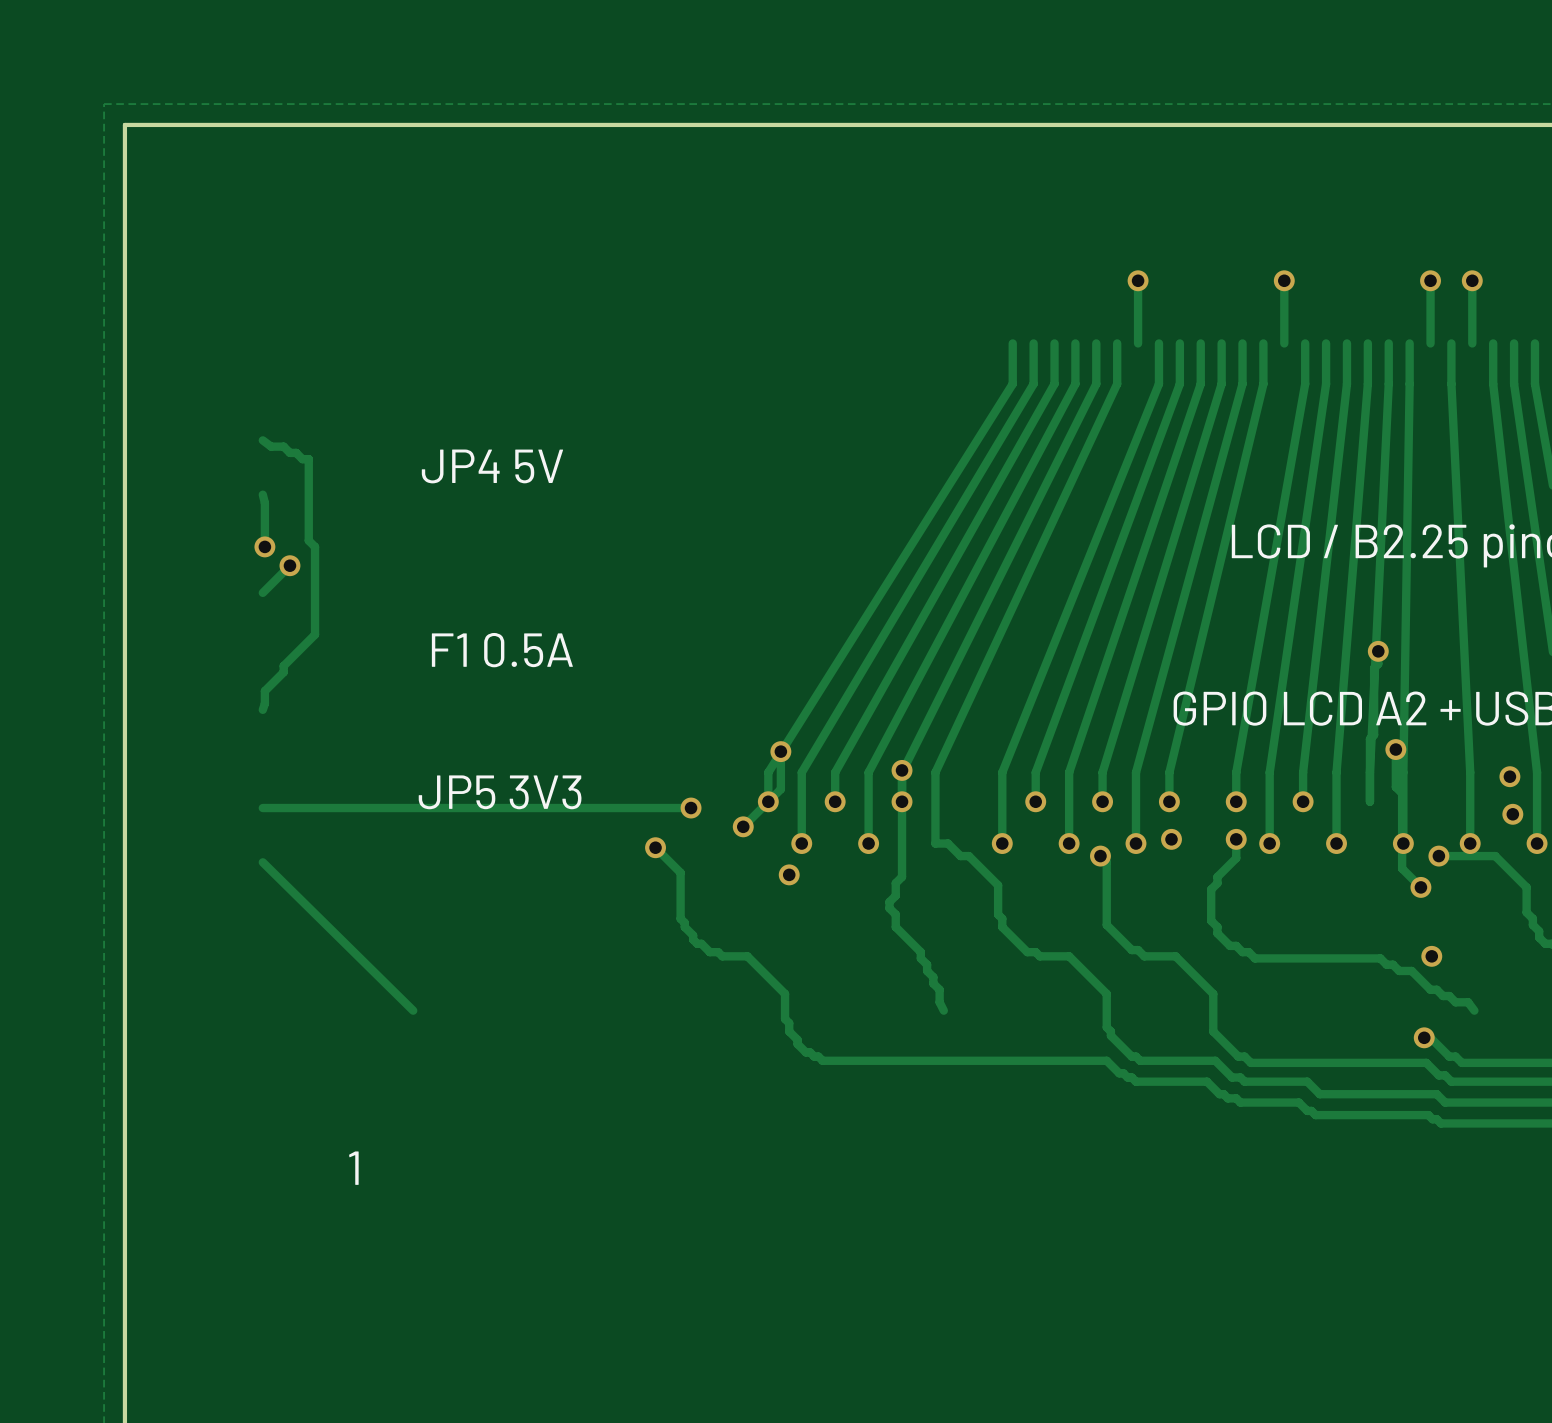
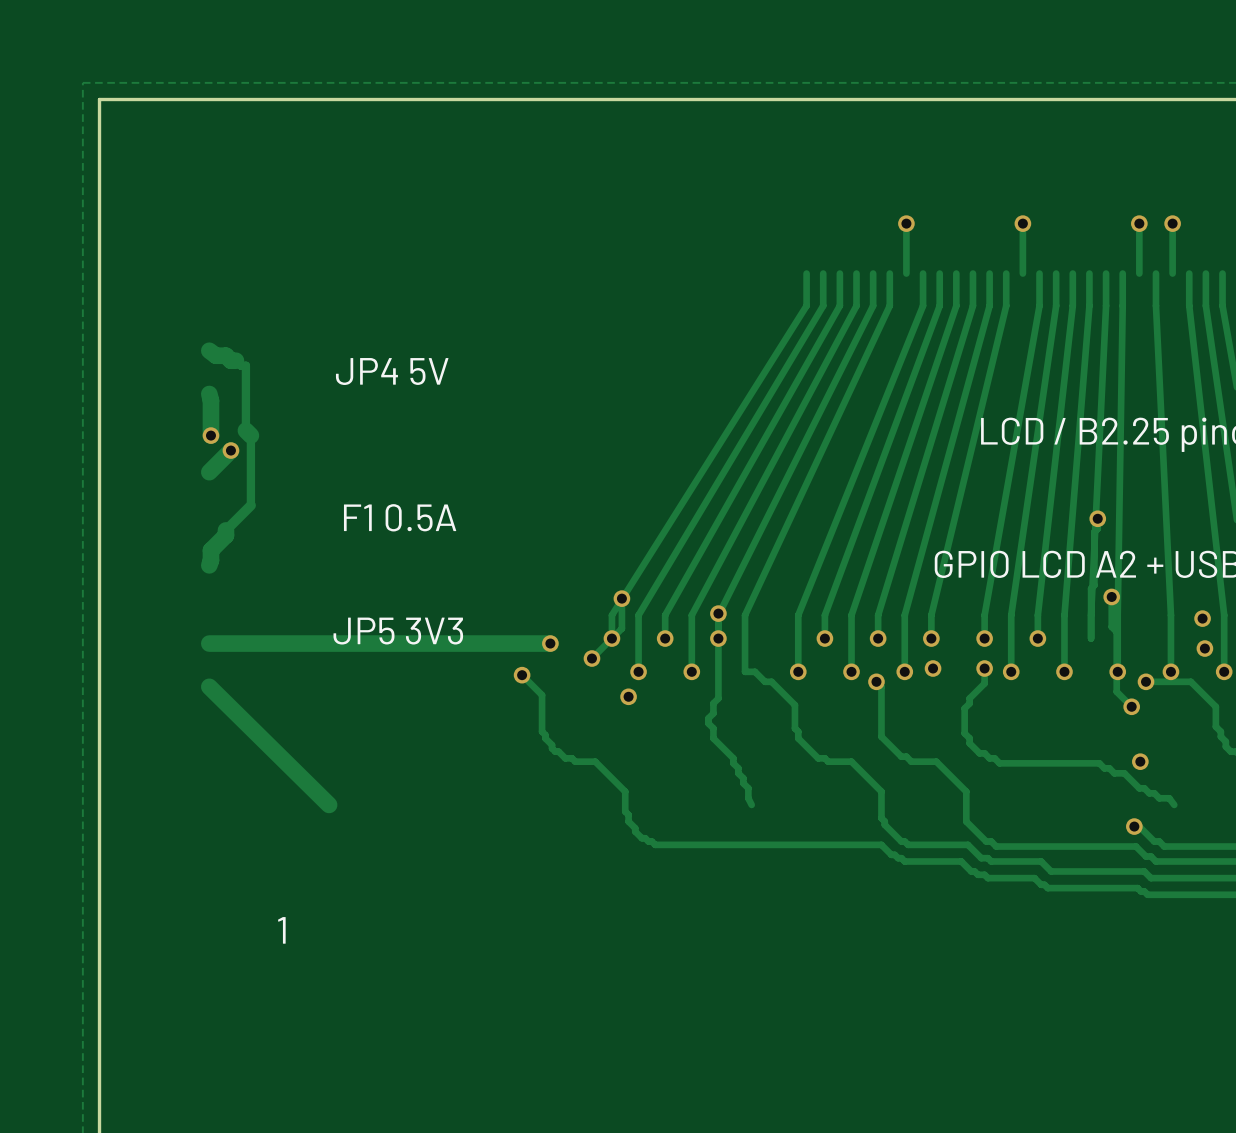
track width: thin (262, 440) (271, 446) (283, 446) (289, 452) (296, 452) (302, 459) (308, 459) (308, 540) (315, 546) (315, 634) (283, 665) (283, 672) (264, 691) (262, 709) -> thick (209, 350) (215, 355) (225, 355) (230, 360) (235, 360) (240, 365) (245, 365) (245, 430) (250, 435) (250, 505) (225, 530) (225, 535) (210, 550) (209, 565)
track width: thin (262, 494) (264, 503) (264, 546) -> thick (209, 393) (210, 435)
track width: thin (289, 565) (262, 592) -> thick (230, 450) (209, 472)
track width: thin (262, 808) (691, 808) -> thick (209, 643) (550, 643)
track width: thin (262, 862) (413, 1010) -> thick (209, 686) (329, 804)

